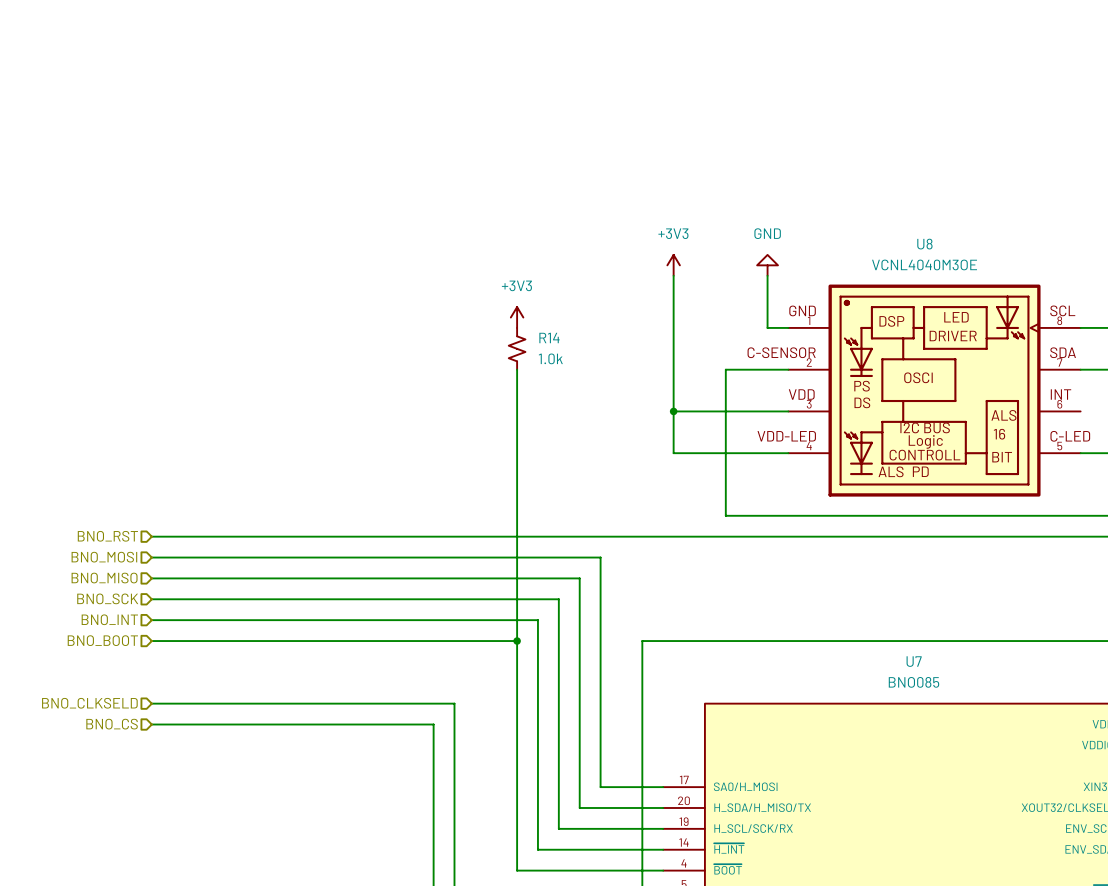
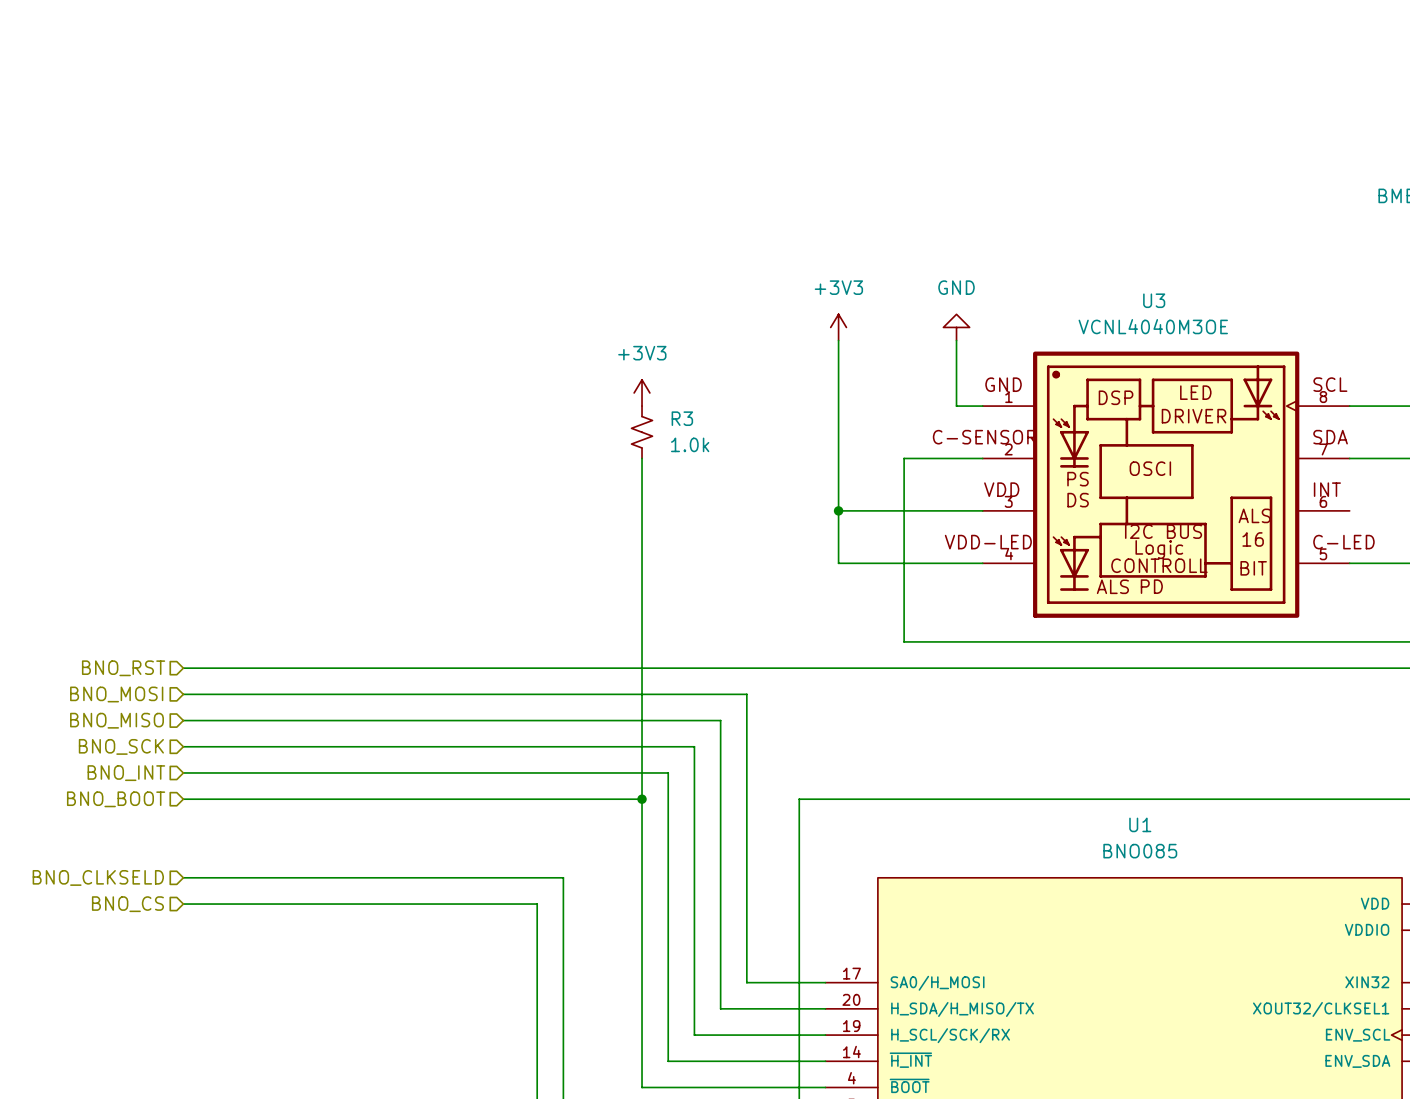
U8 name: U8 (924, 244) -> U3 (1154, 300)
R14 name: R14 (549, 338) -> R3 (682, 418)
U7 name: U7 (914, 661) -> U1 (1140, 824)

